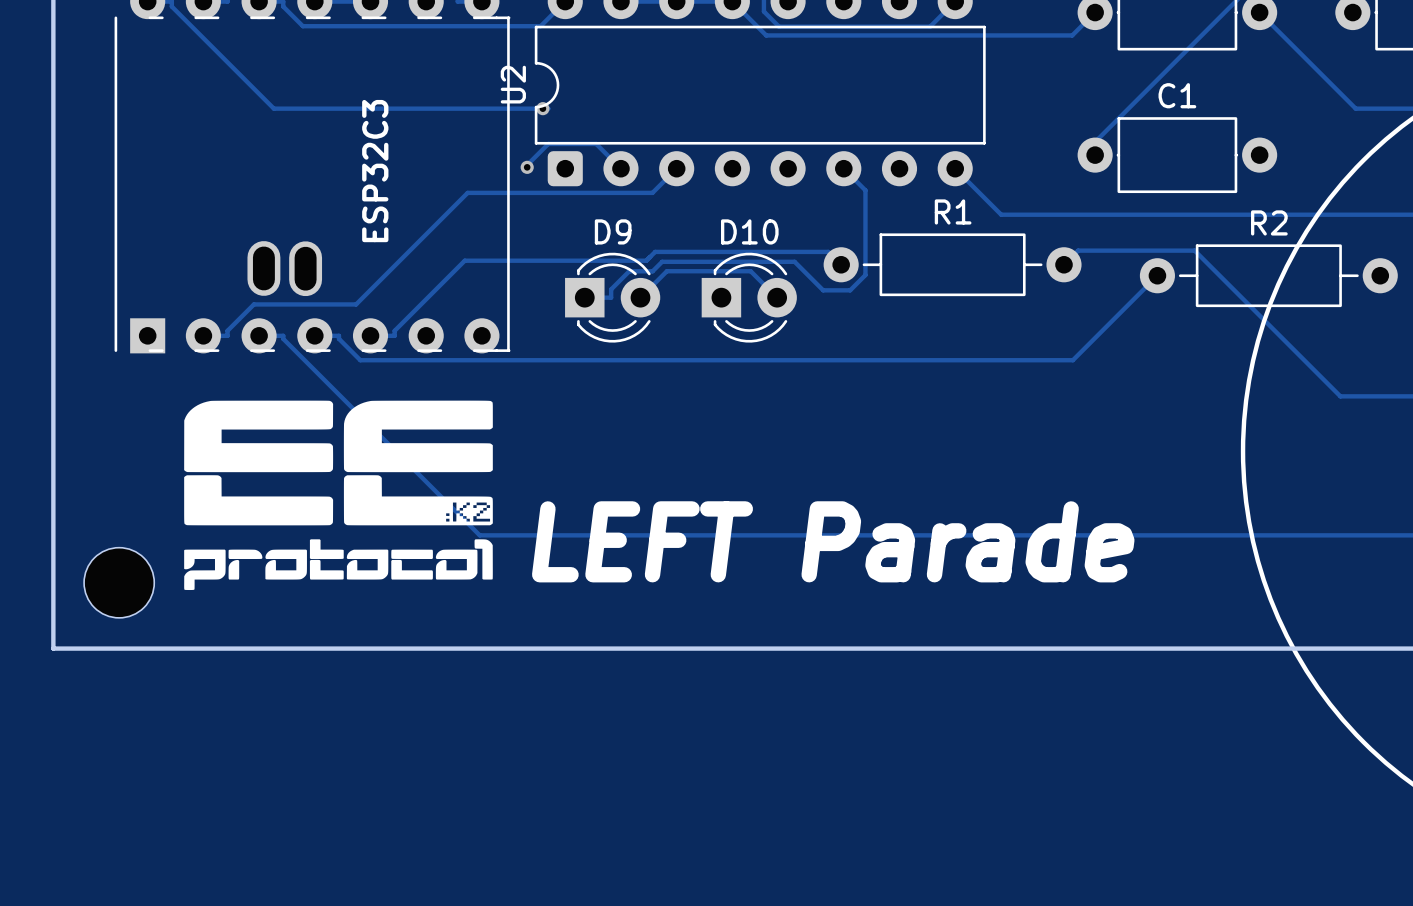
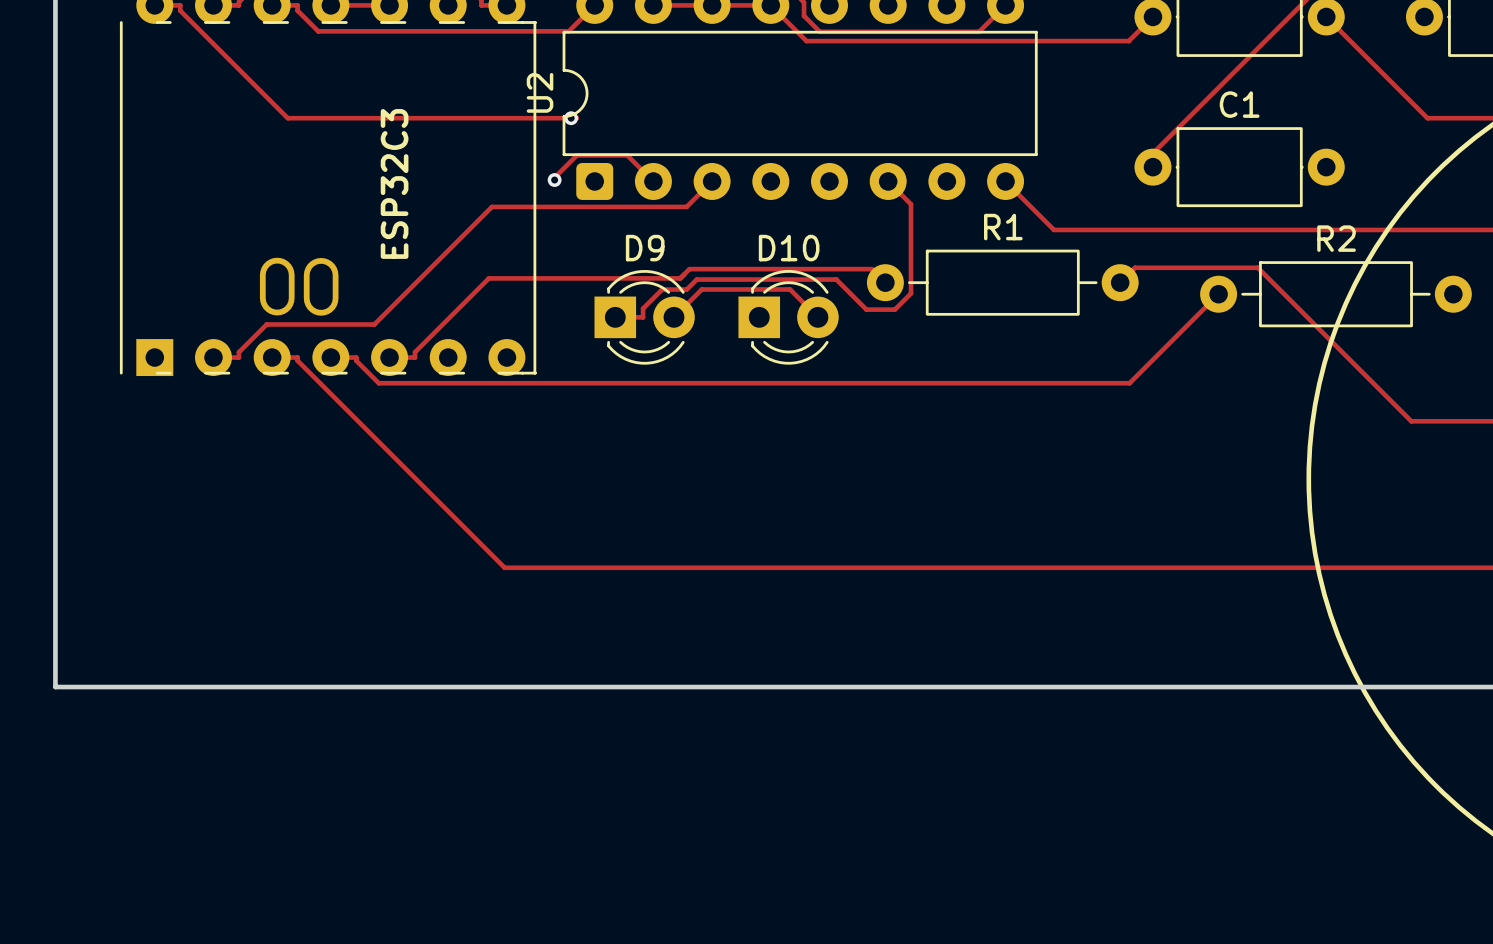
drawing: [184, 400, 493, 591] -> none
text: LEFT Parade (833, 541) -> none
part: (119, 582) -> none

